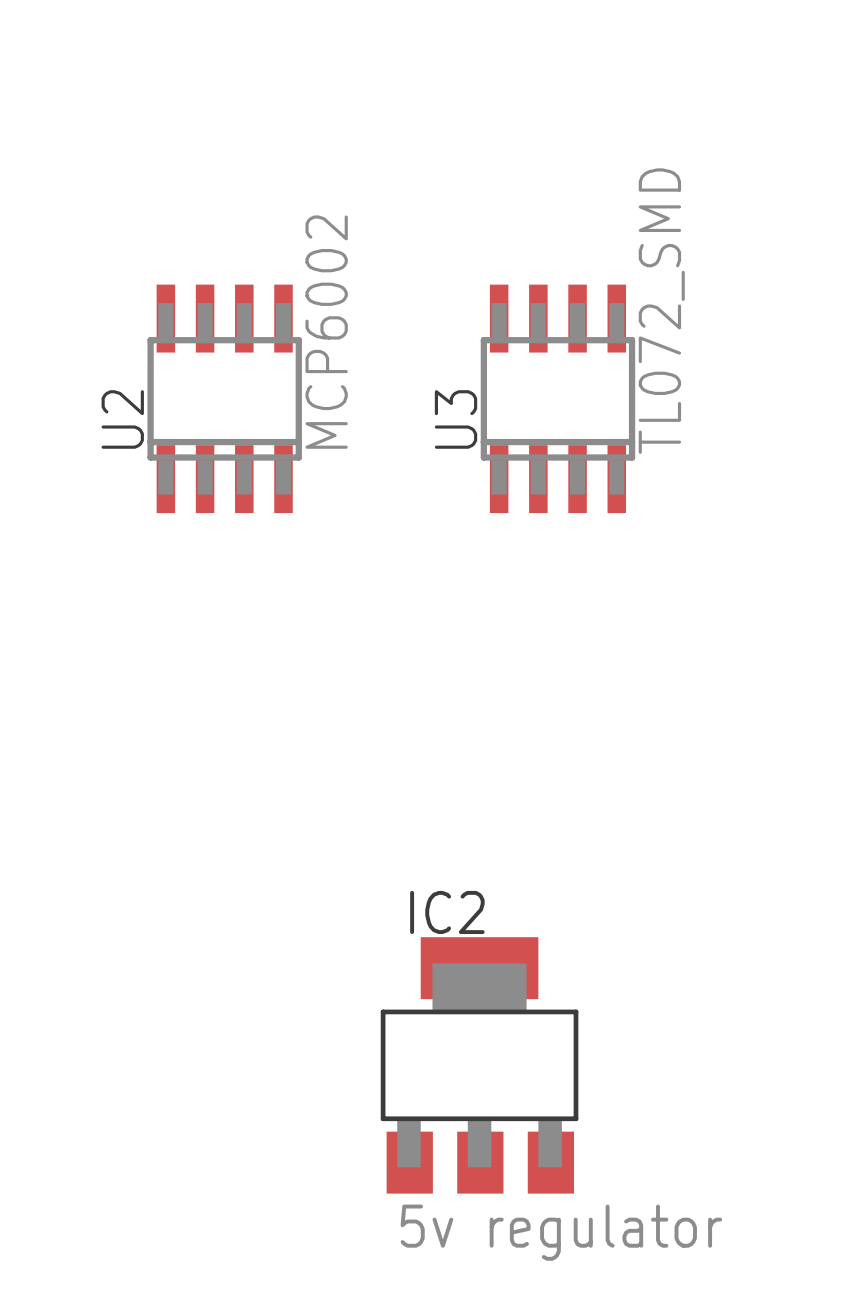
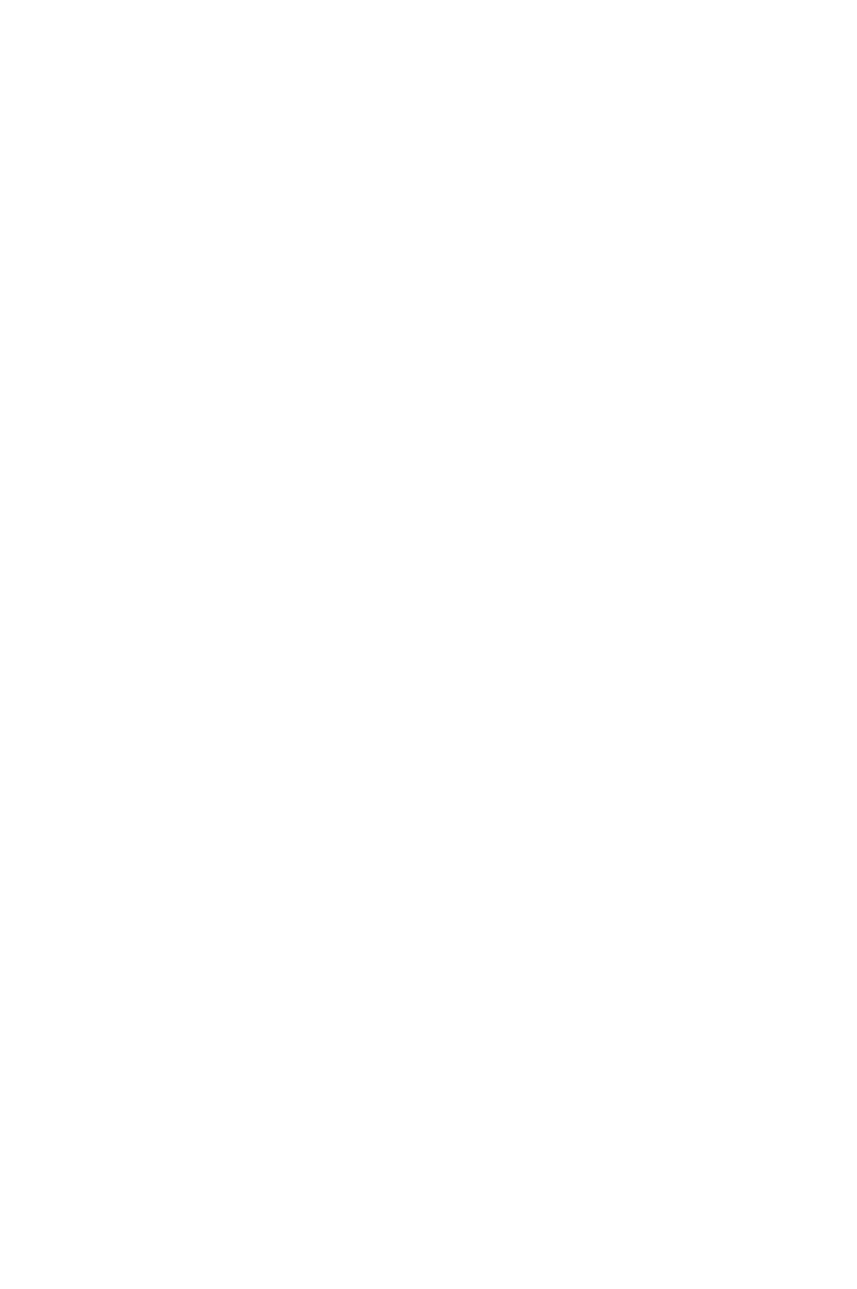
U2: MCP6002 (224, 398) -> none
U3: TL072_SMD (557, 398) -> none
IC2: 5v regulator (479, 1065) -> none

